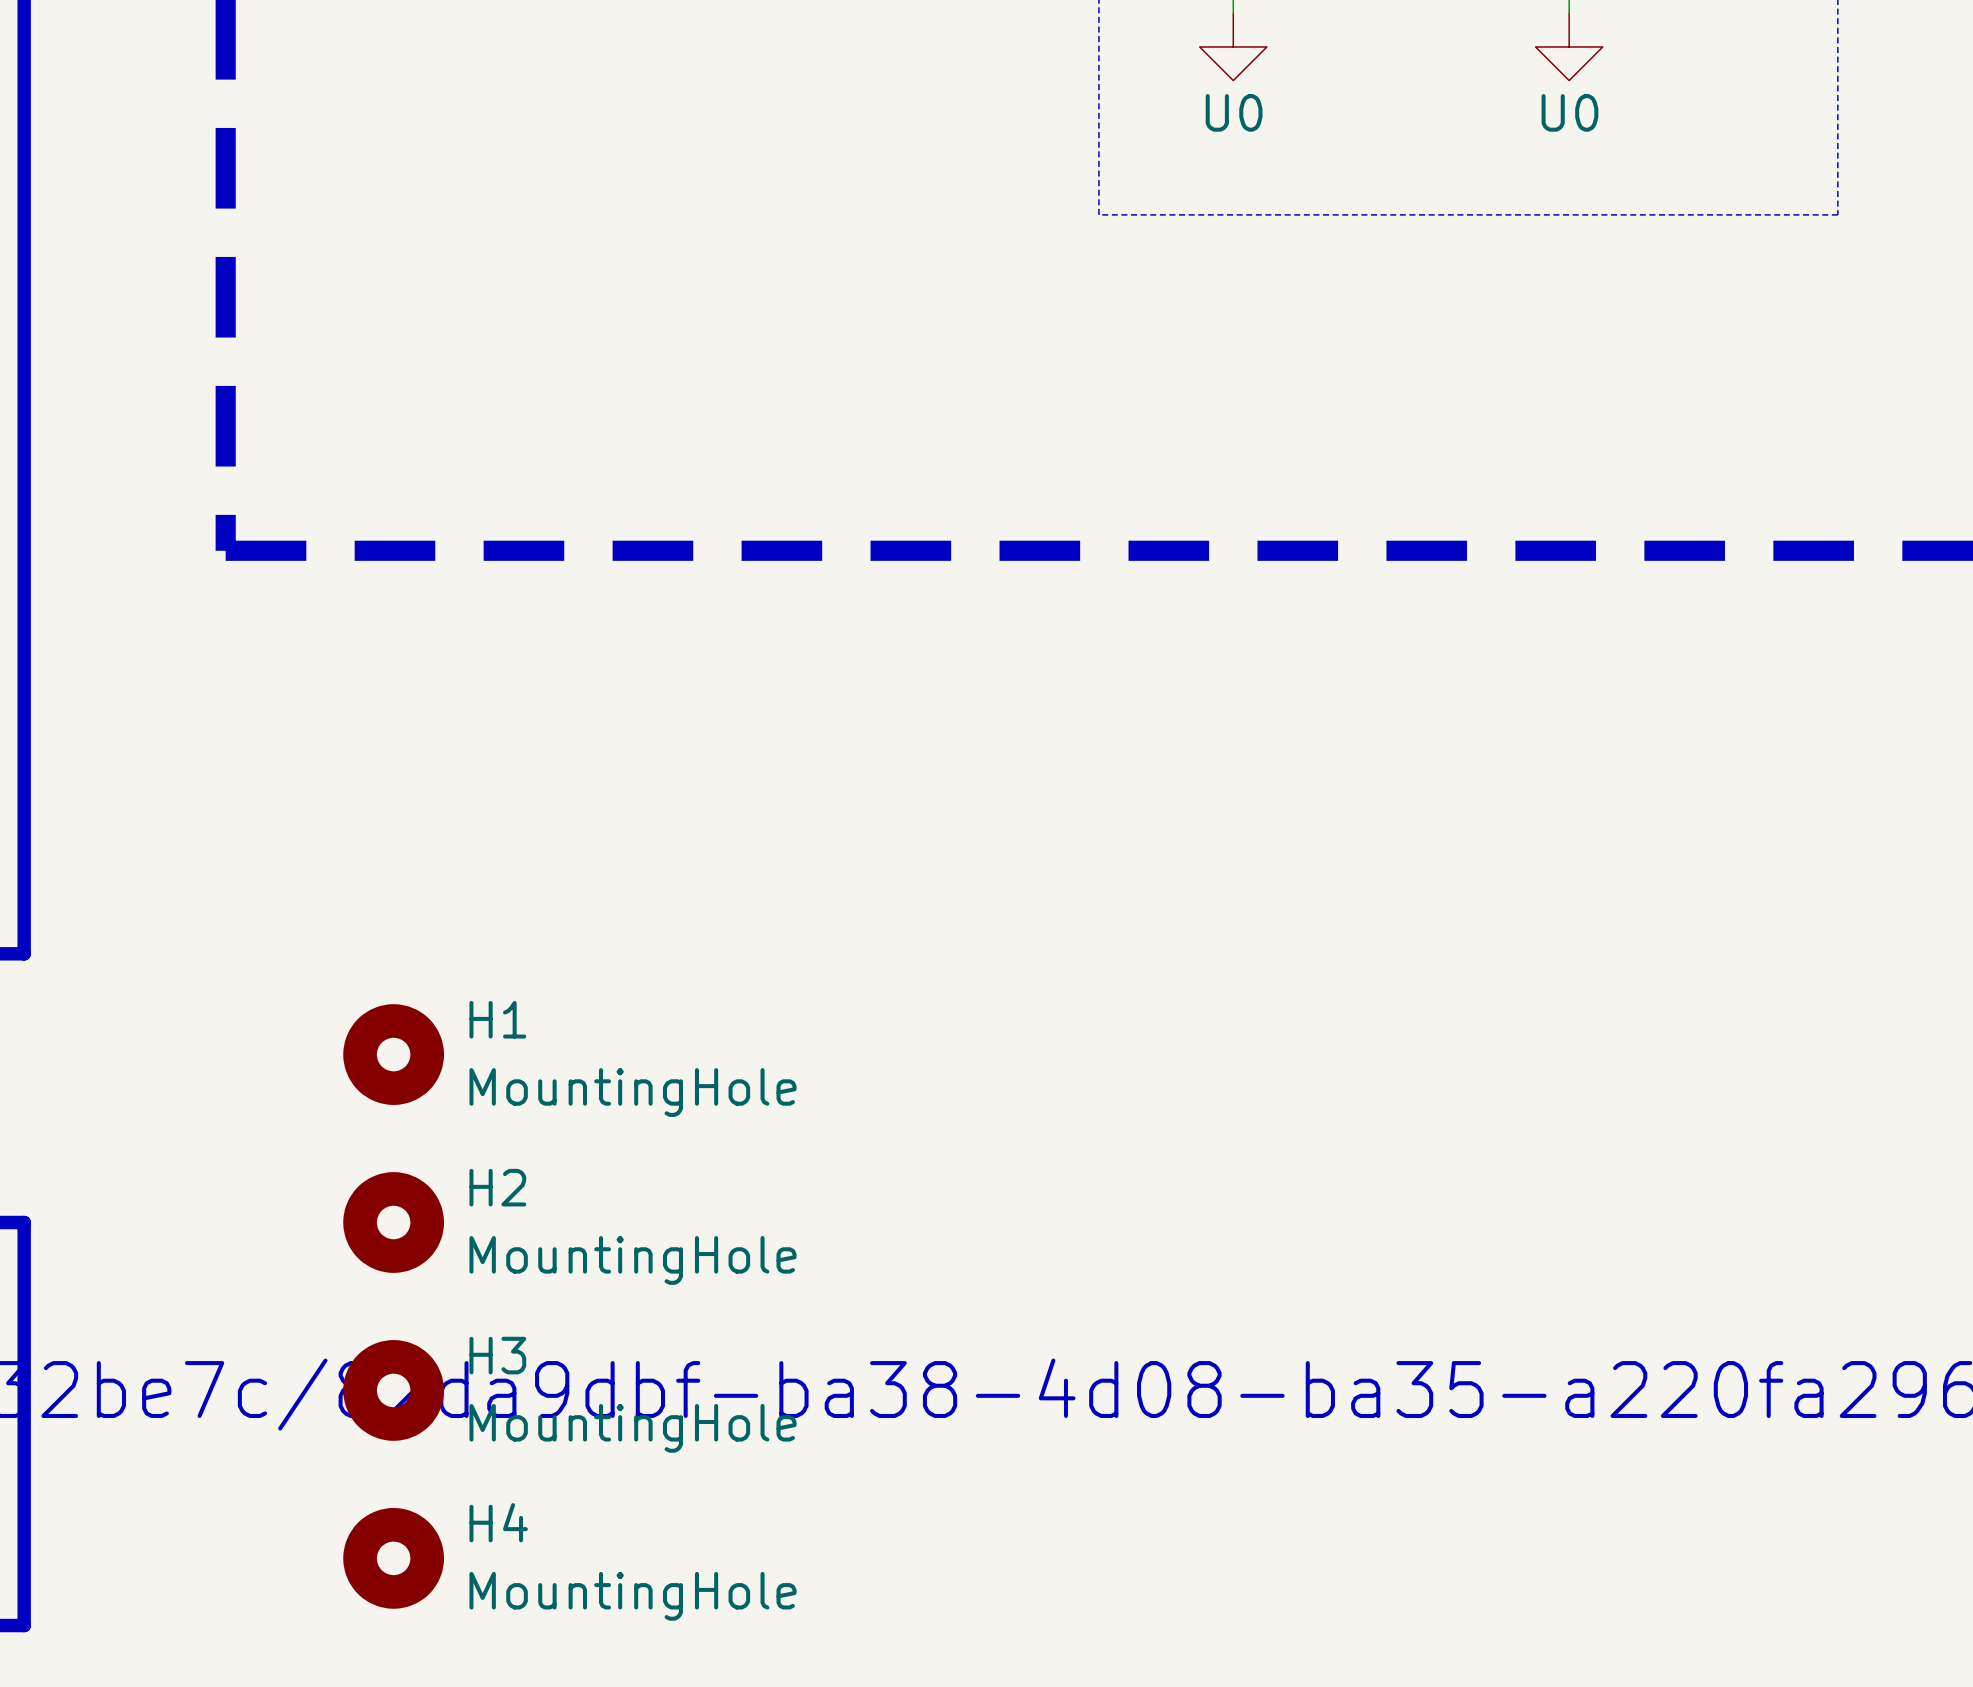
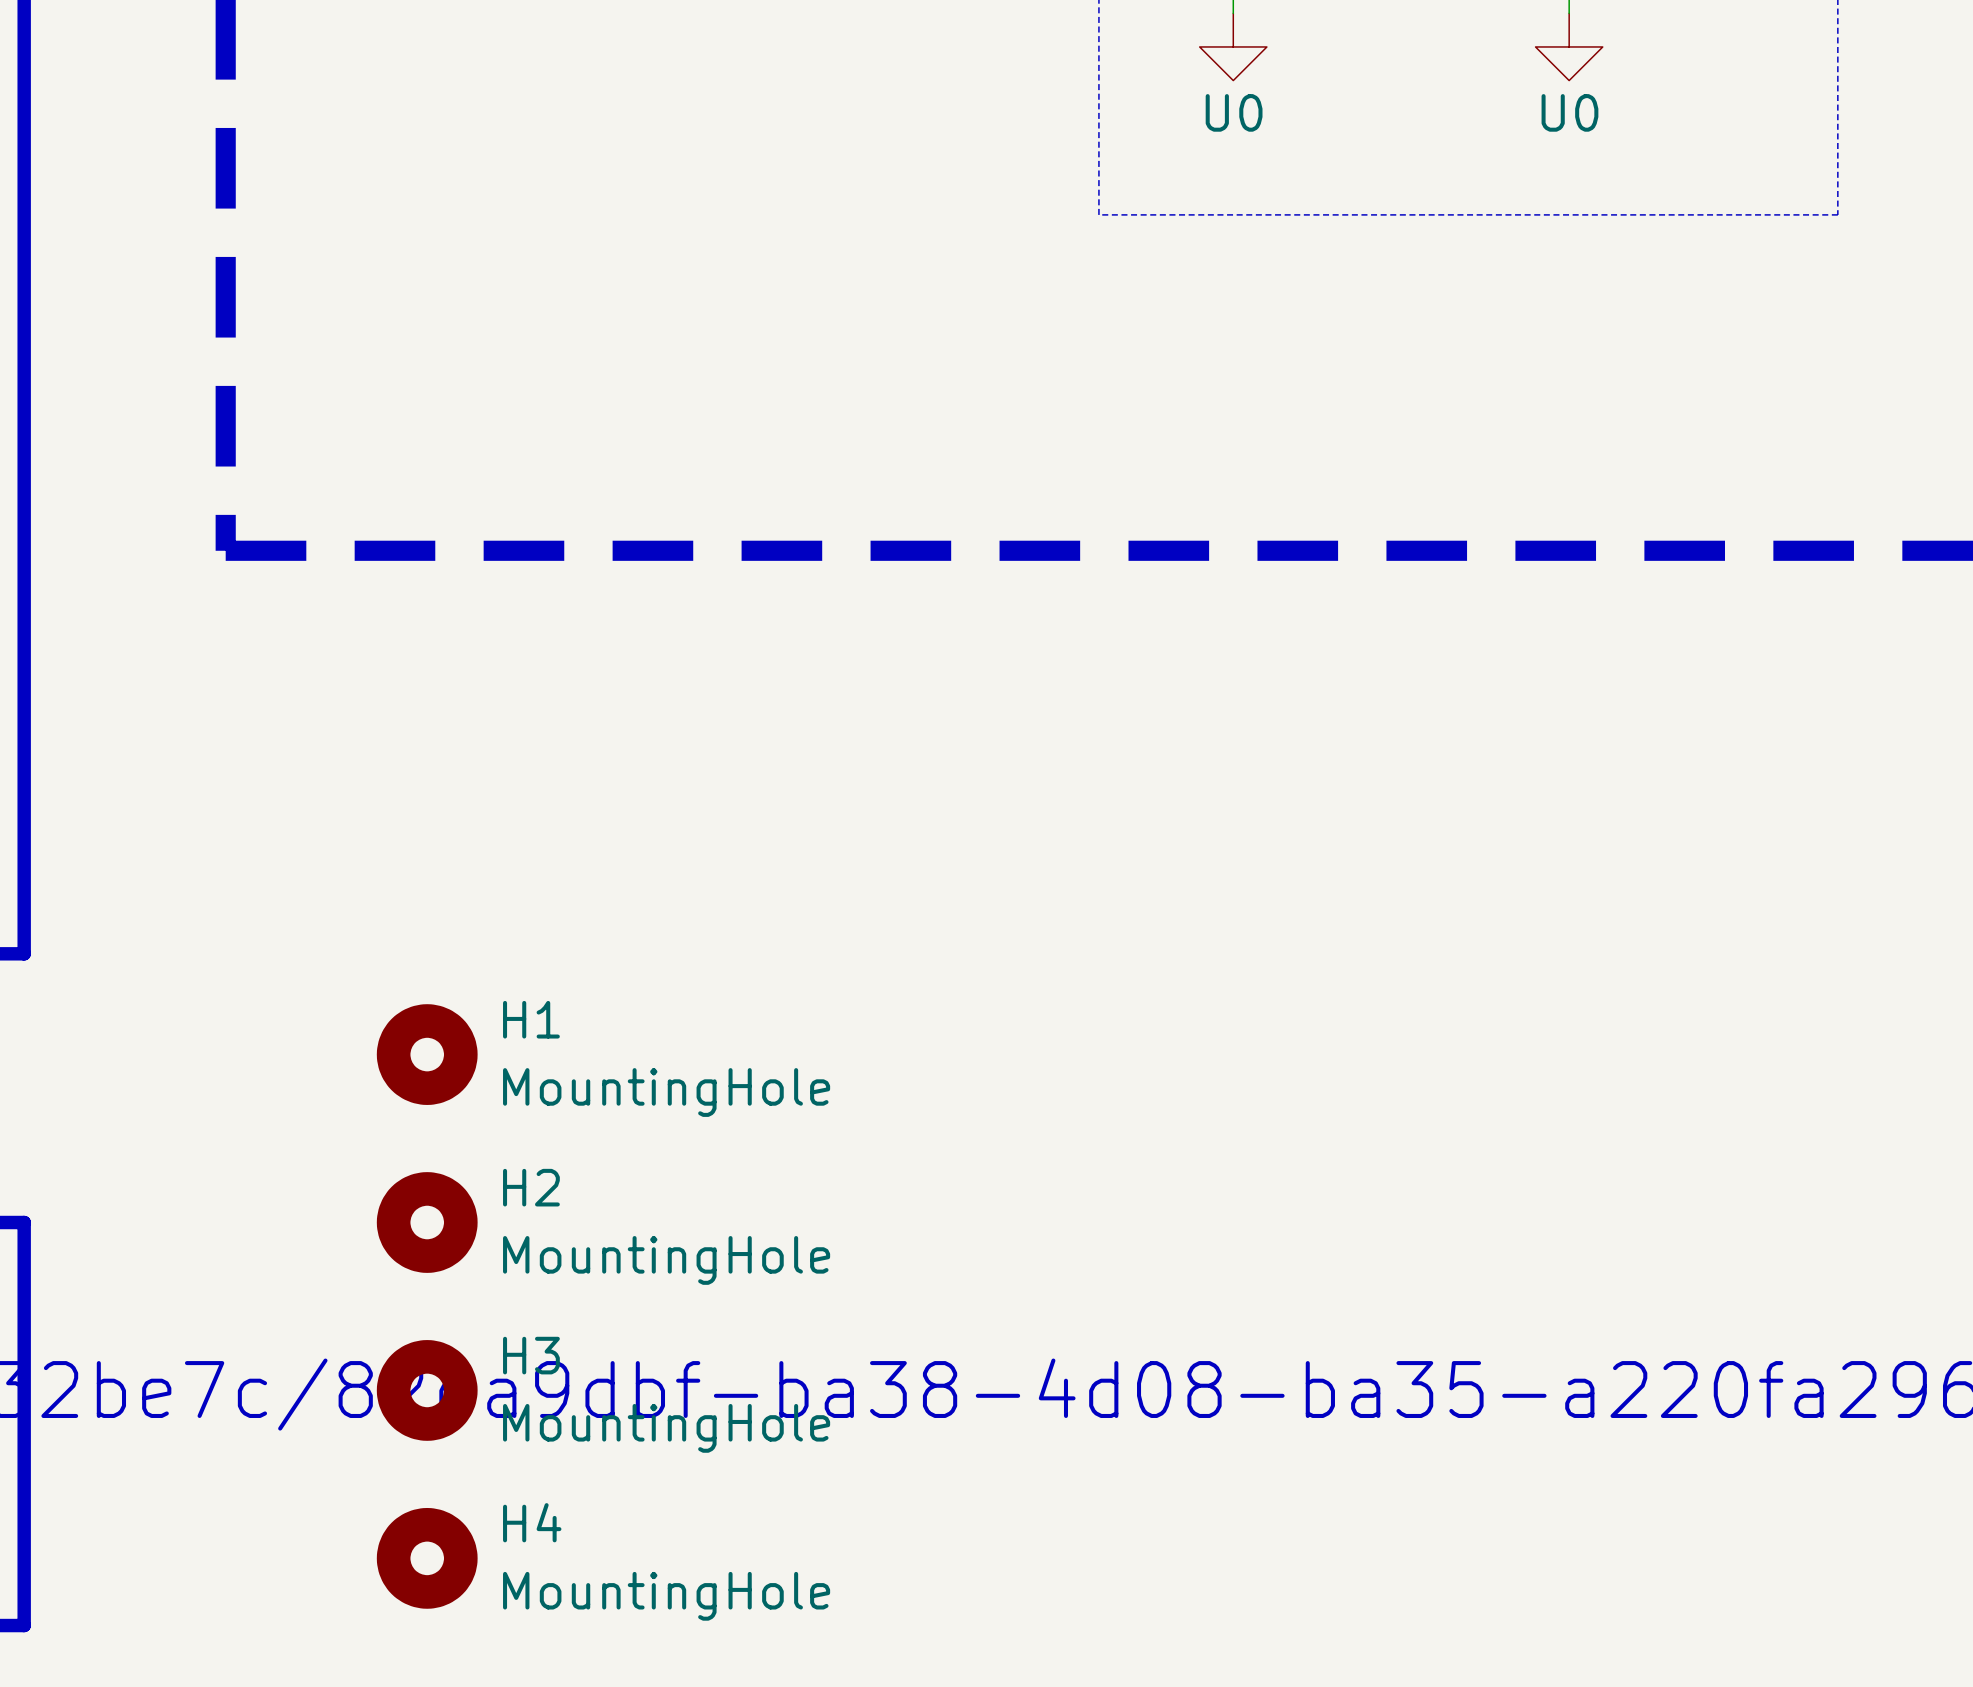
H1 position: (393, 1054) -> (427, 1054)
H2 position: (393, 1222) -> (427, 1222)
H3 position: (393, 1390) -> (427, 1390)
H4 position: (393, 1558) -> (427, 1558)

